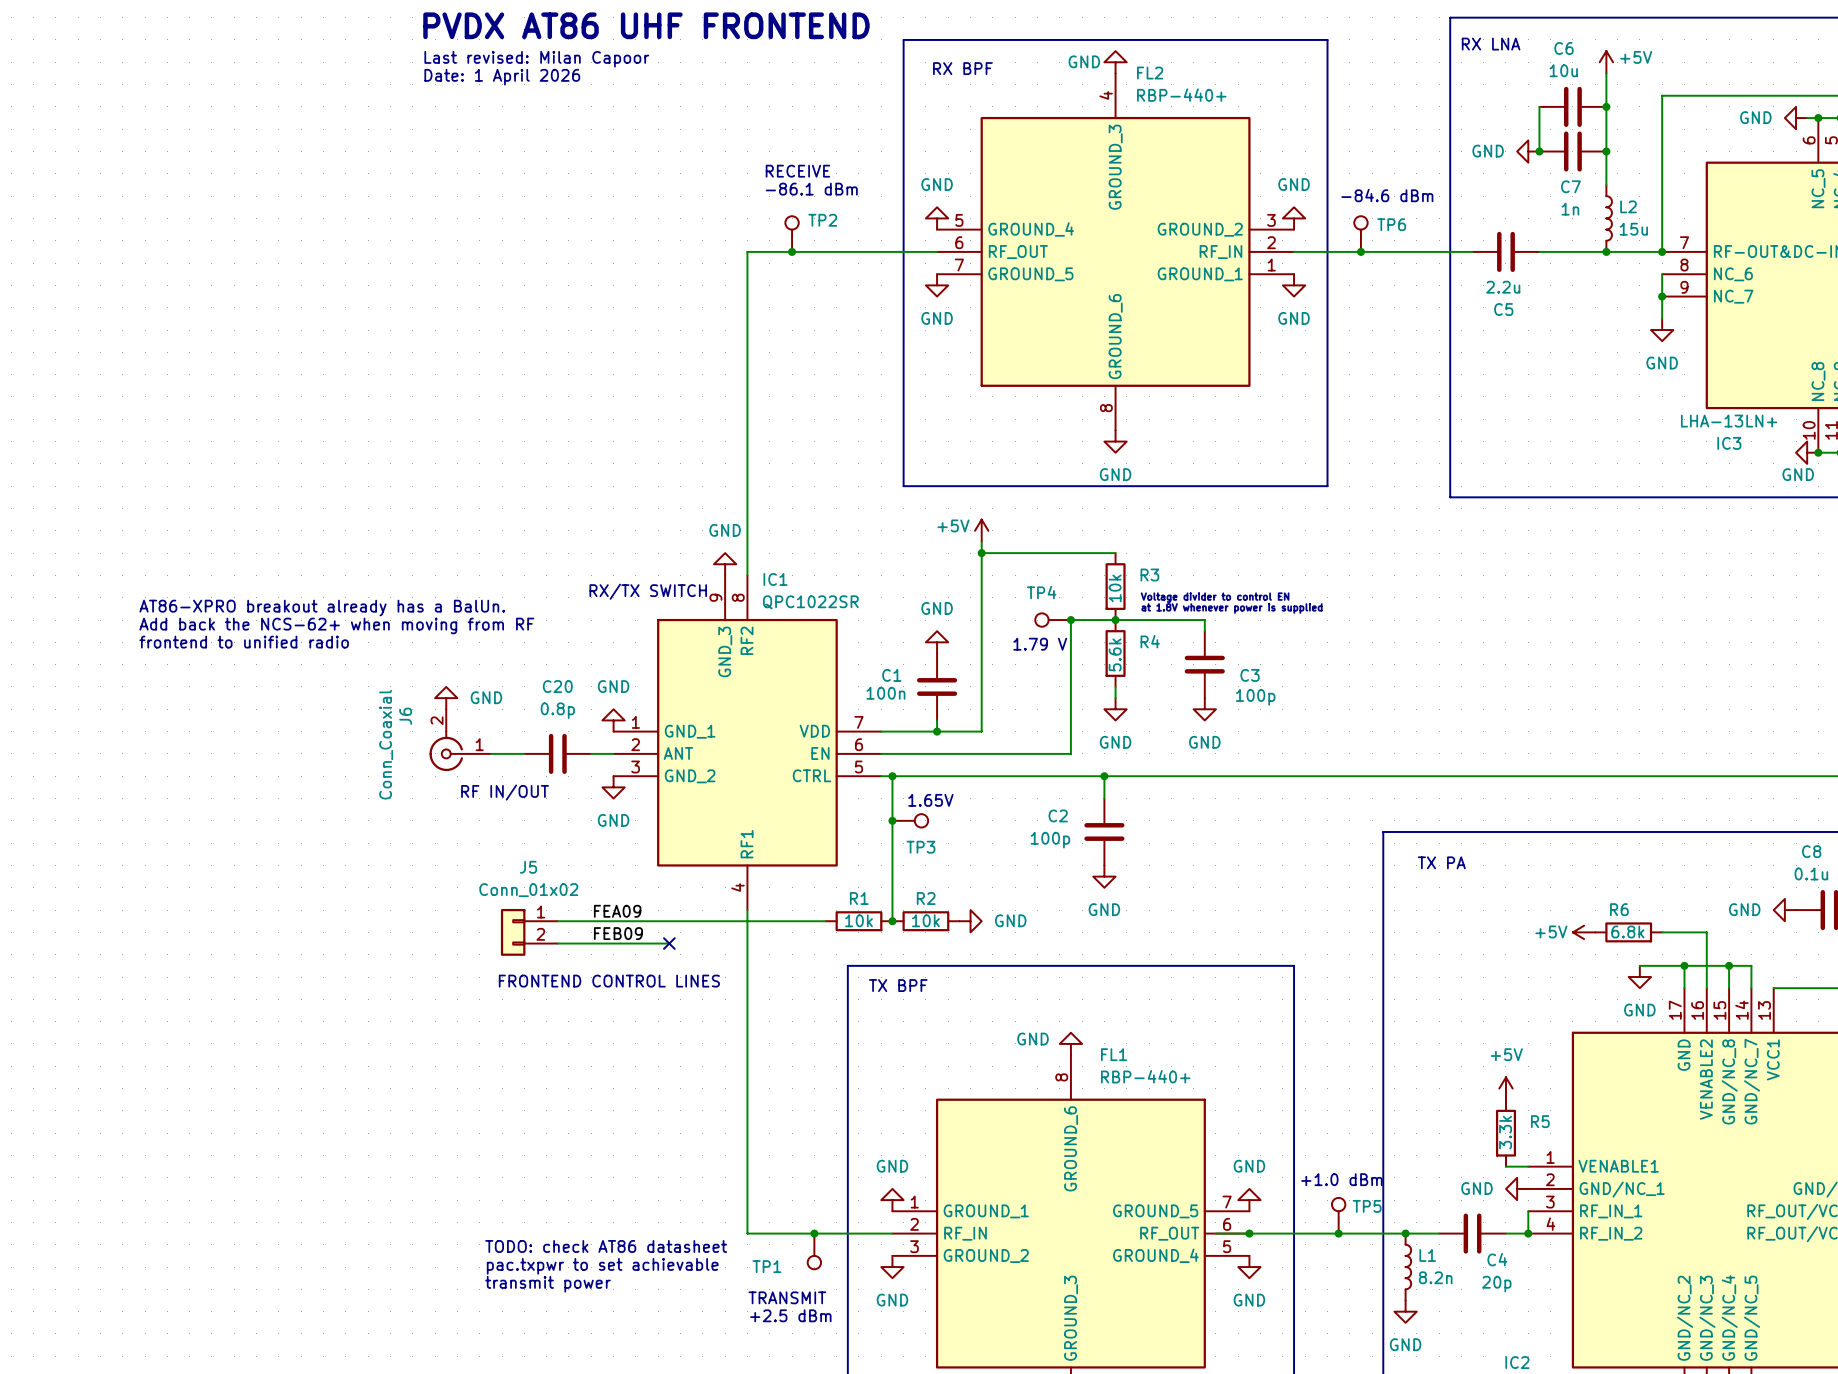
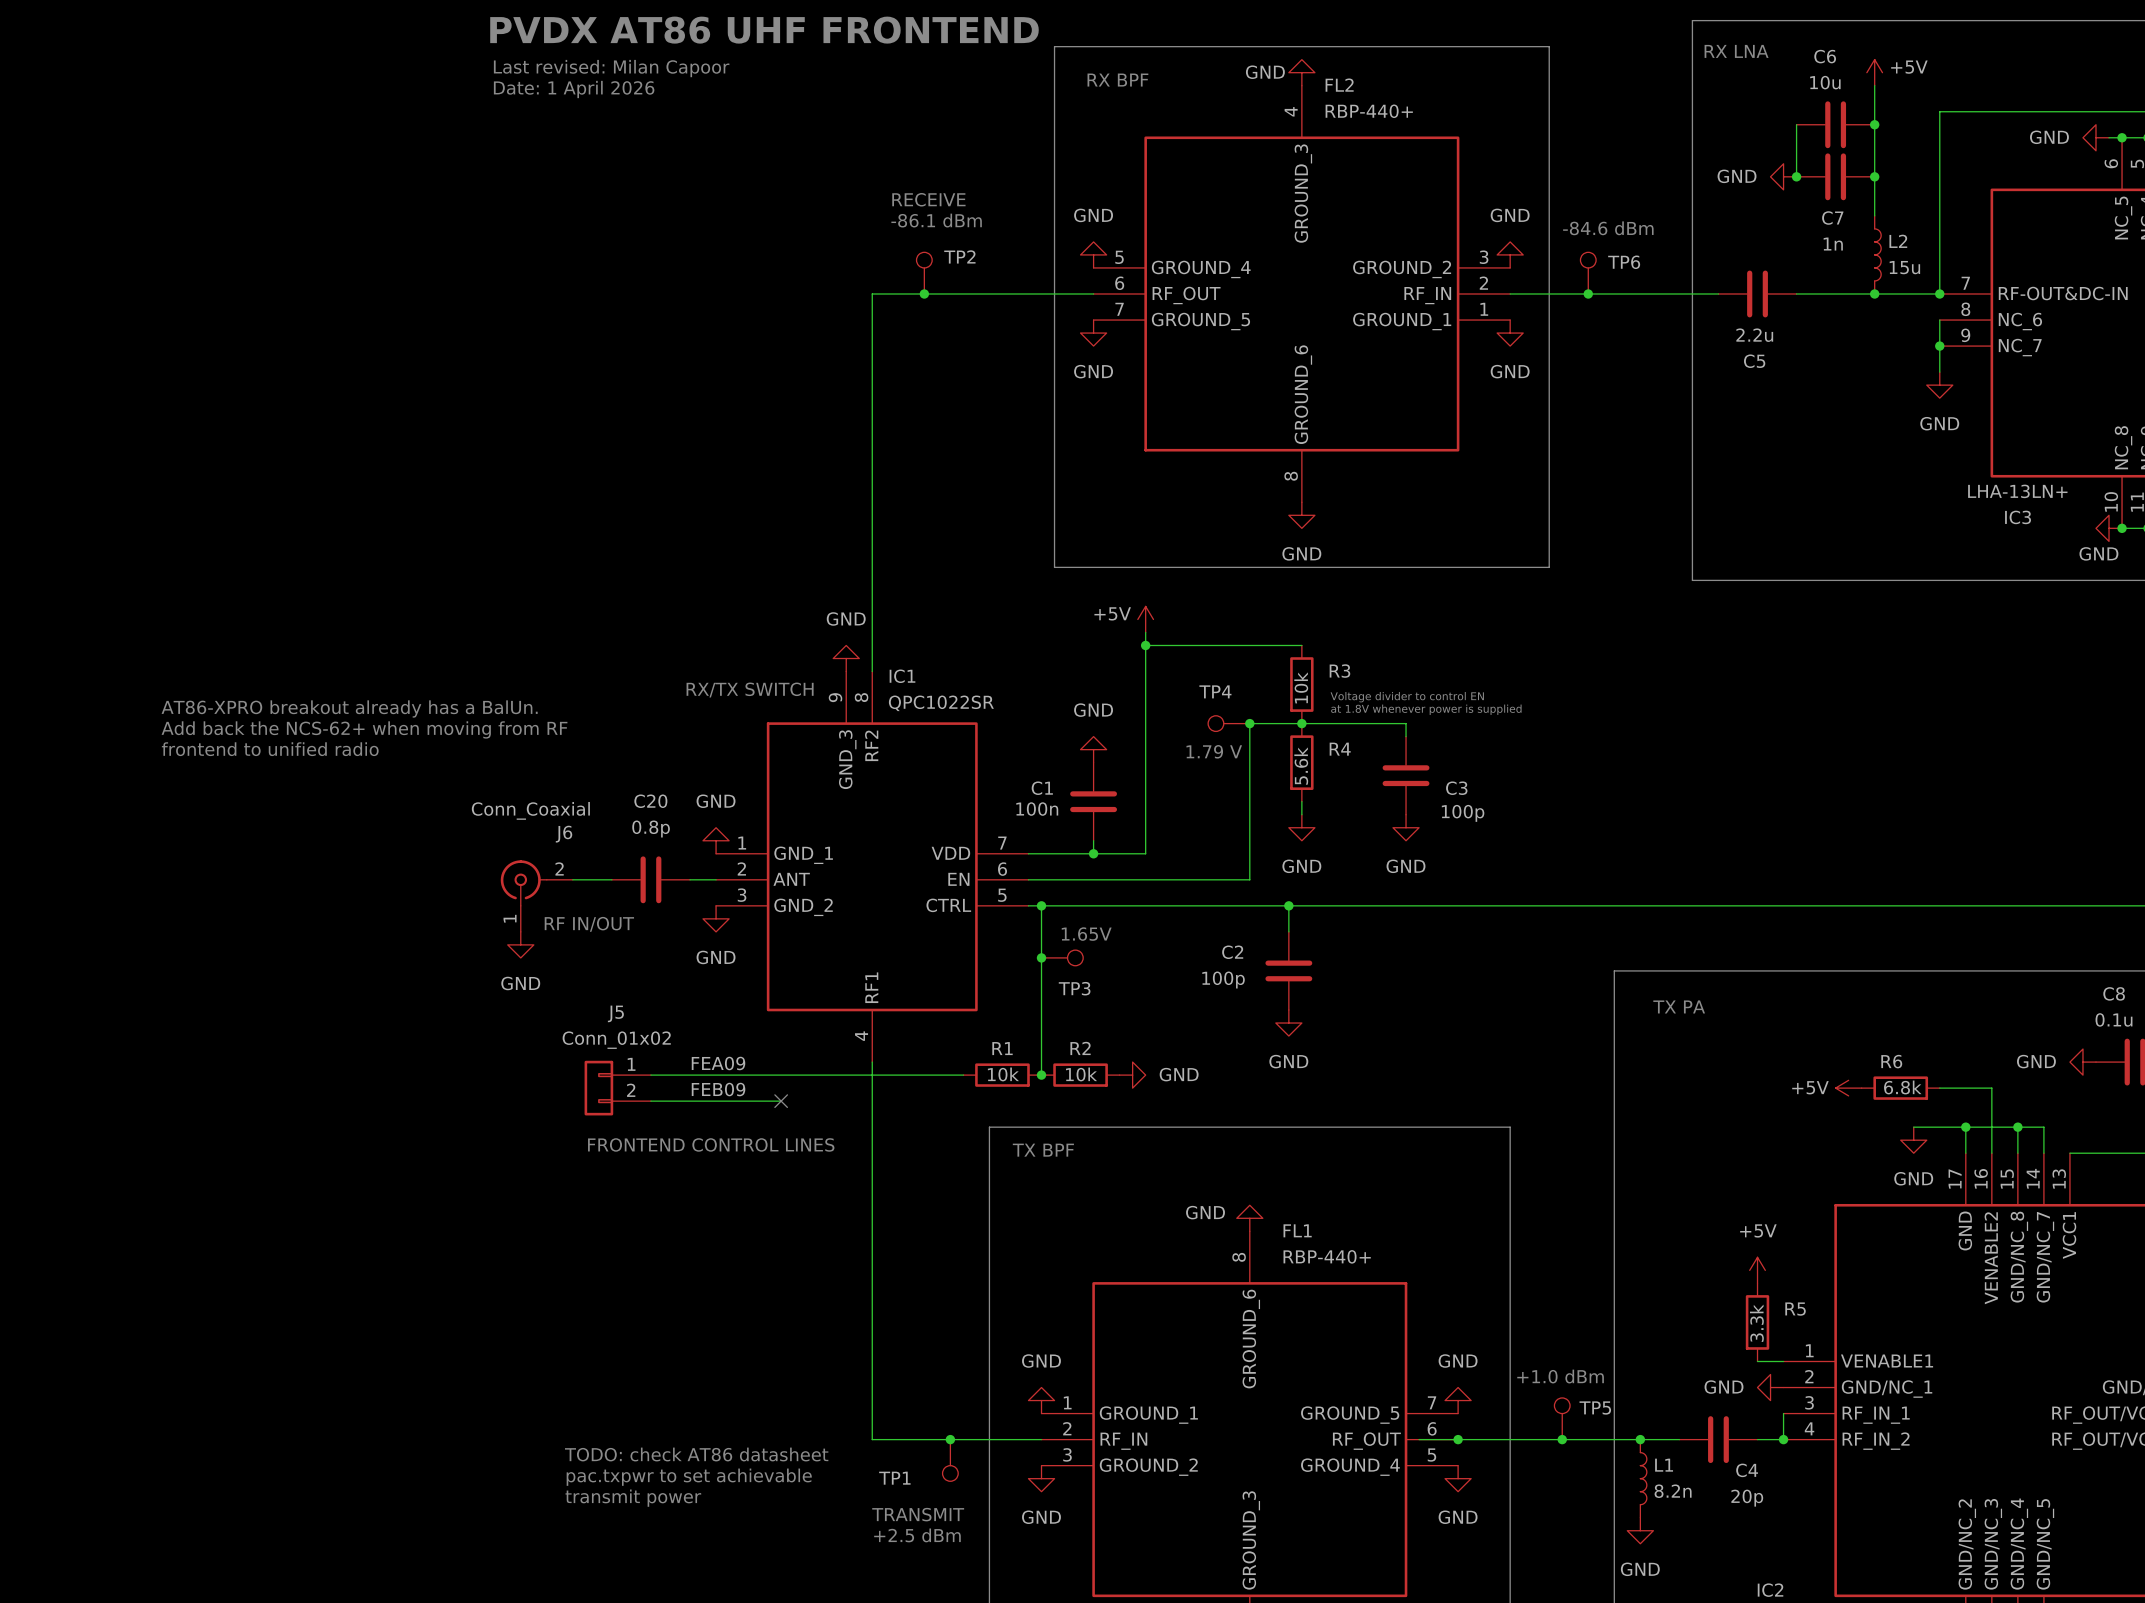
power symbol text position: GND (486, 697) -> GND (520, 983)
power symbol rotation: 0° (446, 698) -> 180° (520, 944)
power symbol position: GND (446, 698) -> GND (520, 944)
J6 rotation: 0° (449, 751) -> 90° clockwise (523, 883)

